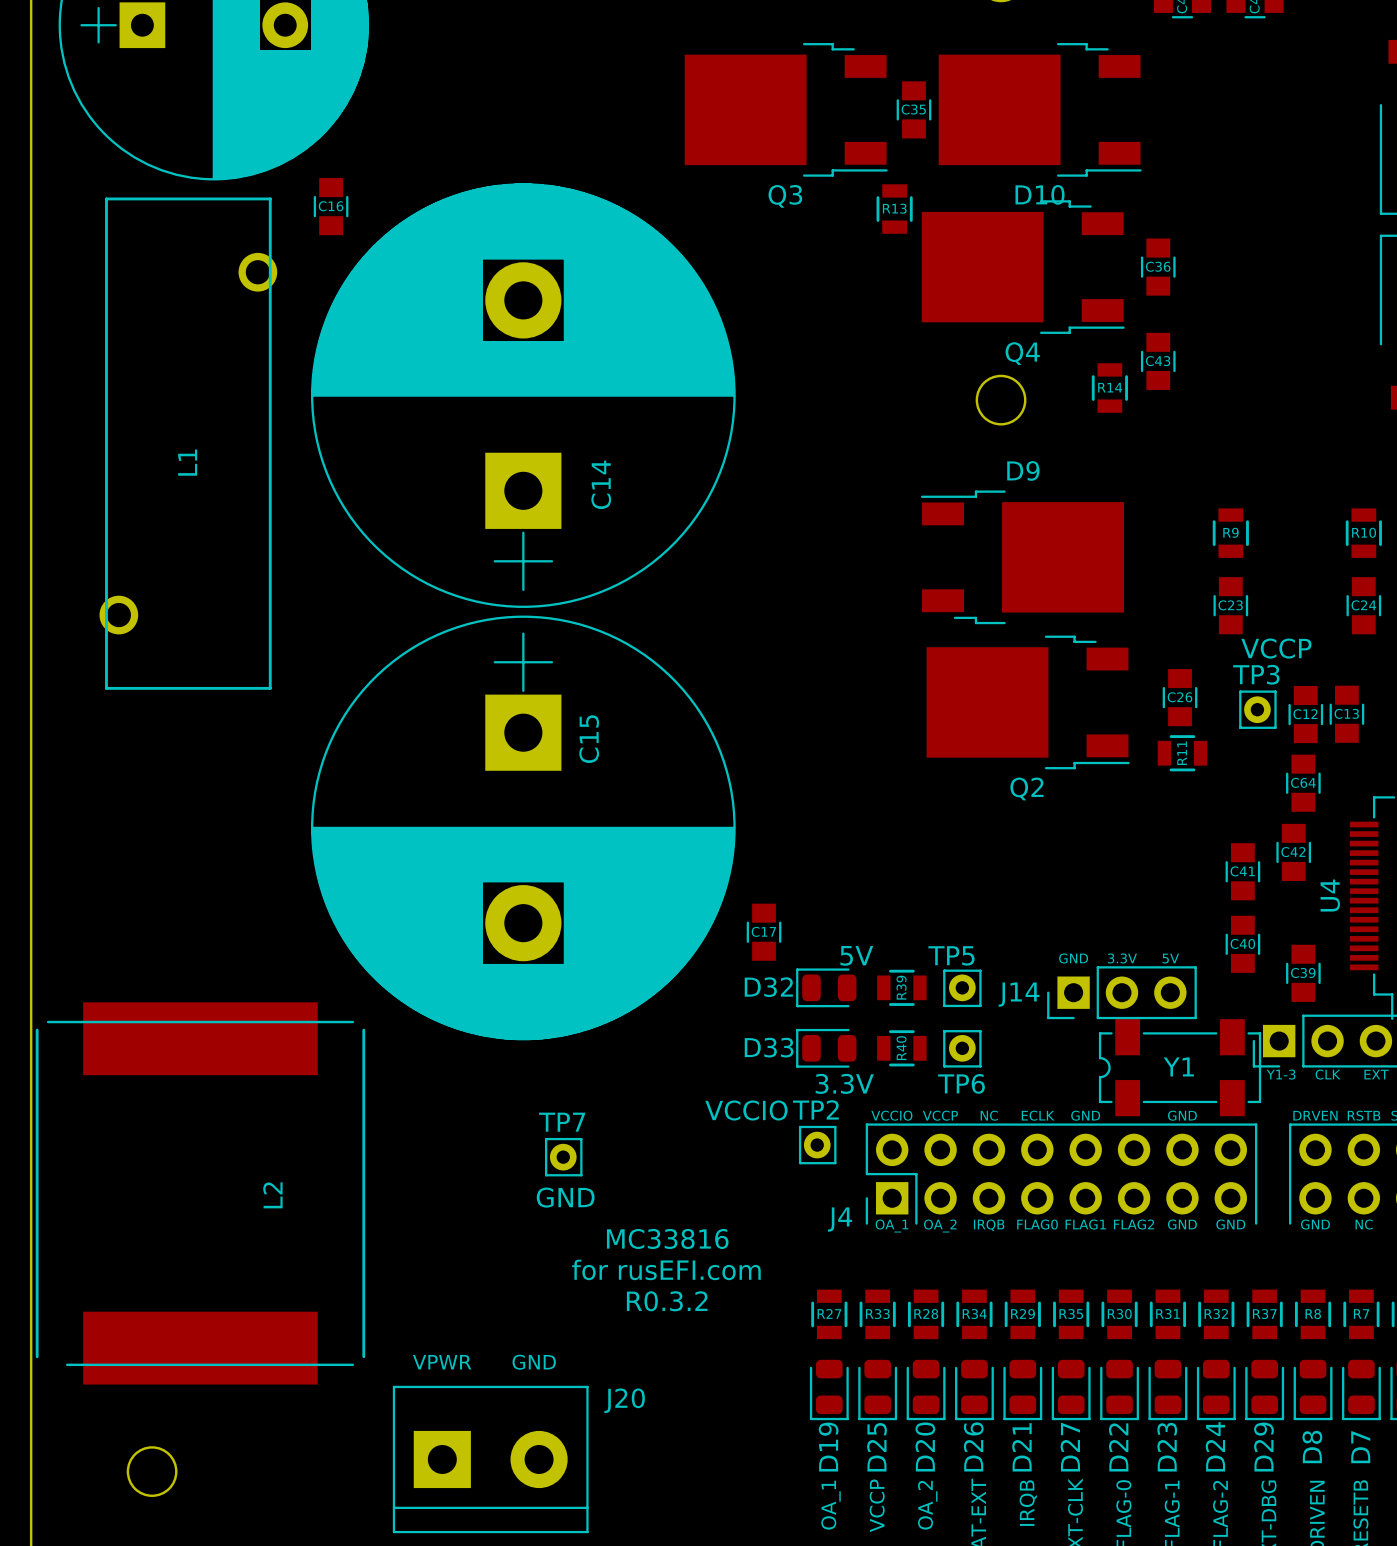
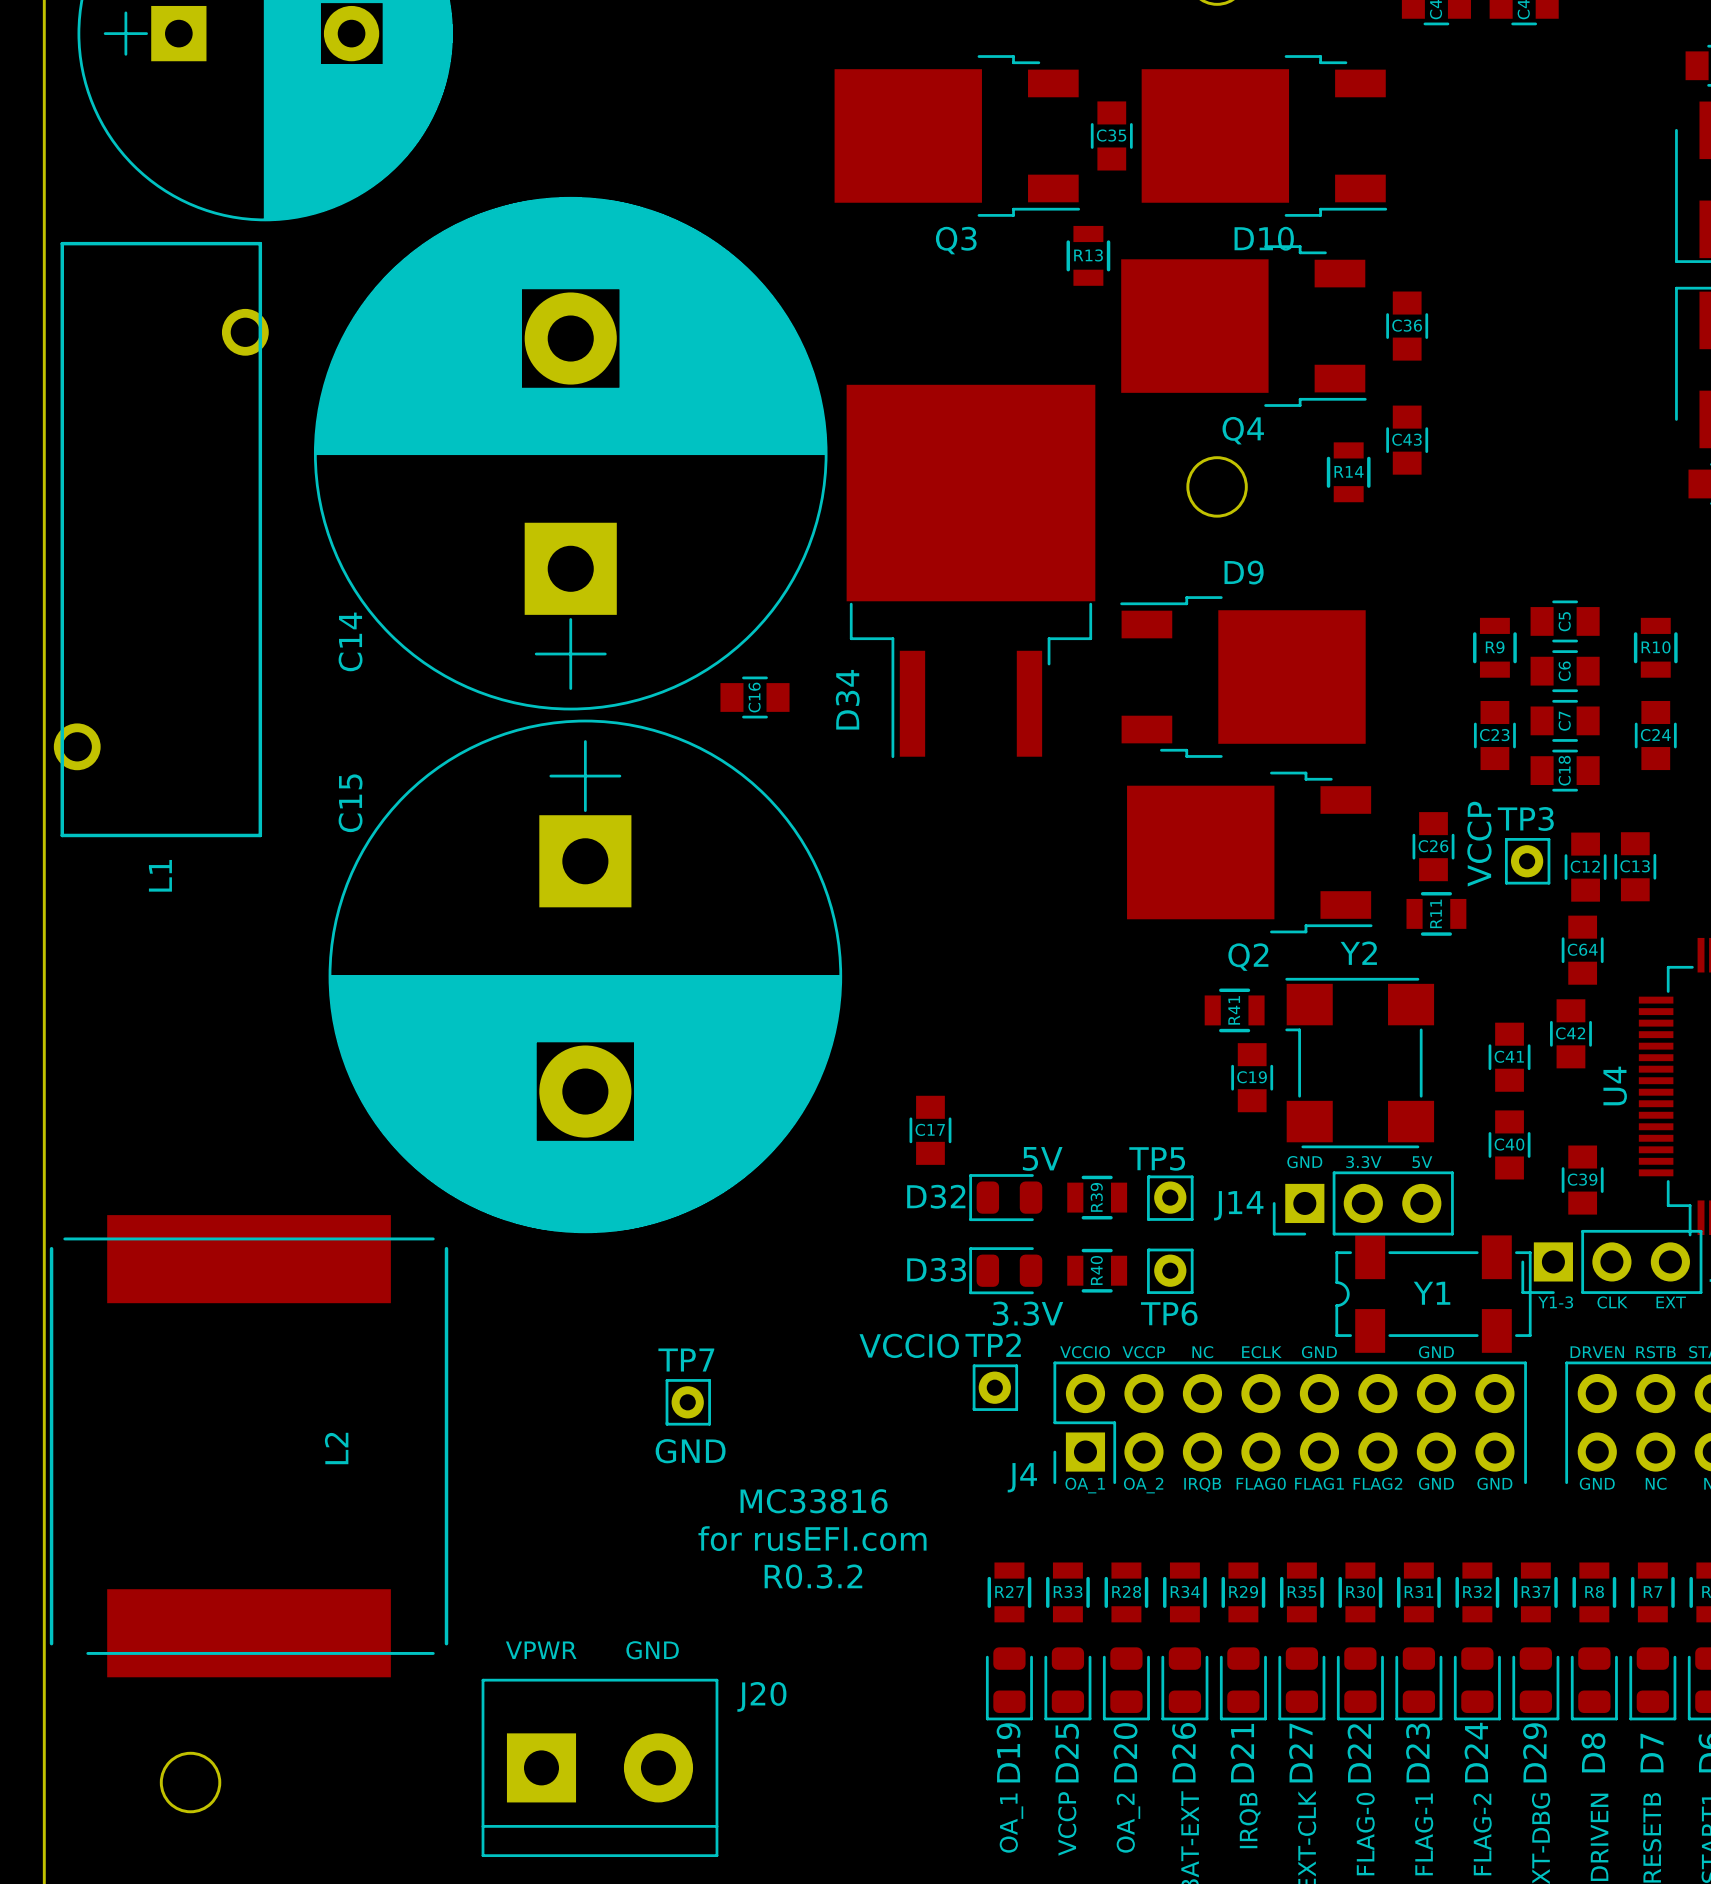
C16 rotation: 0° (331, 206) -> 90° clockwise (754, 697)
C16 position: (331, 206) -> (754, 697)
C14 position: (523, 395) -> (570, 453)
L1 position: (188, 443) -> (161, 539)
L1 name position: L1 (187, 462) -> L1 (160, 875)
D34: none -> (970, 571)
C14 name position: C14 (601, 484) -> C14 (350, 641)
C5: none -> (1565, 621)
C6: none -> (1565, 671)
C7: none -> (1565, 720)
C18: none -> (1565, 770)
text rotation: 0° (1276, 648) -> 90° counterclockwise (1479, 844)
C15 name position: C15 (589, 739) -> C15 (350, 803)
C15 position: (523, 827) -> (585, 976)
R41: none -> (1234, 1010)
Y2: none -> (1359, 1063)
C19: none -> (1252, 1077)

